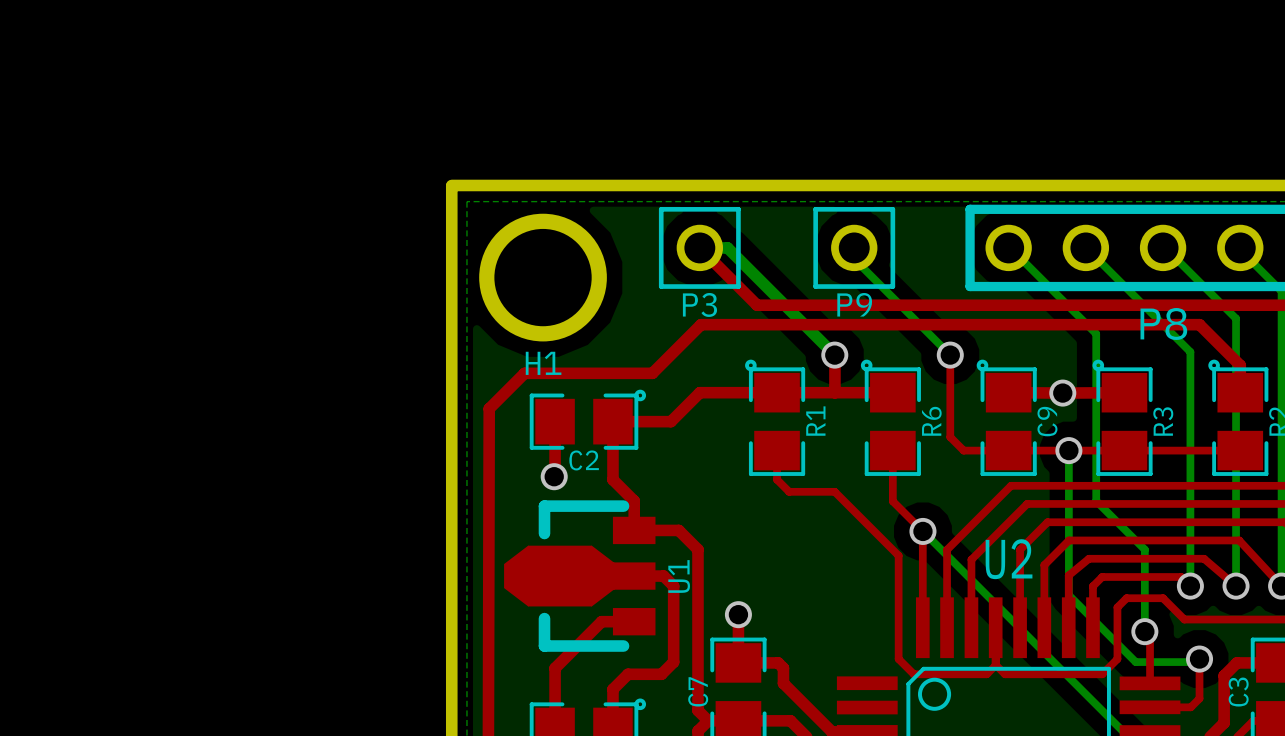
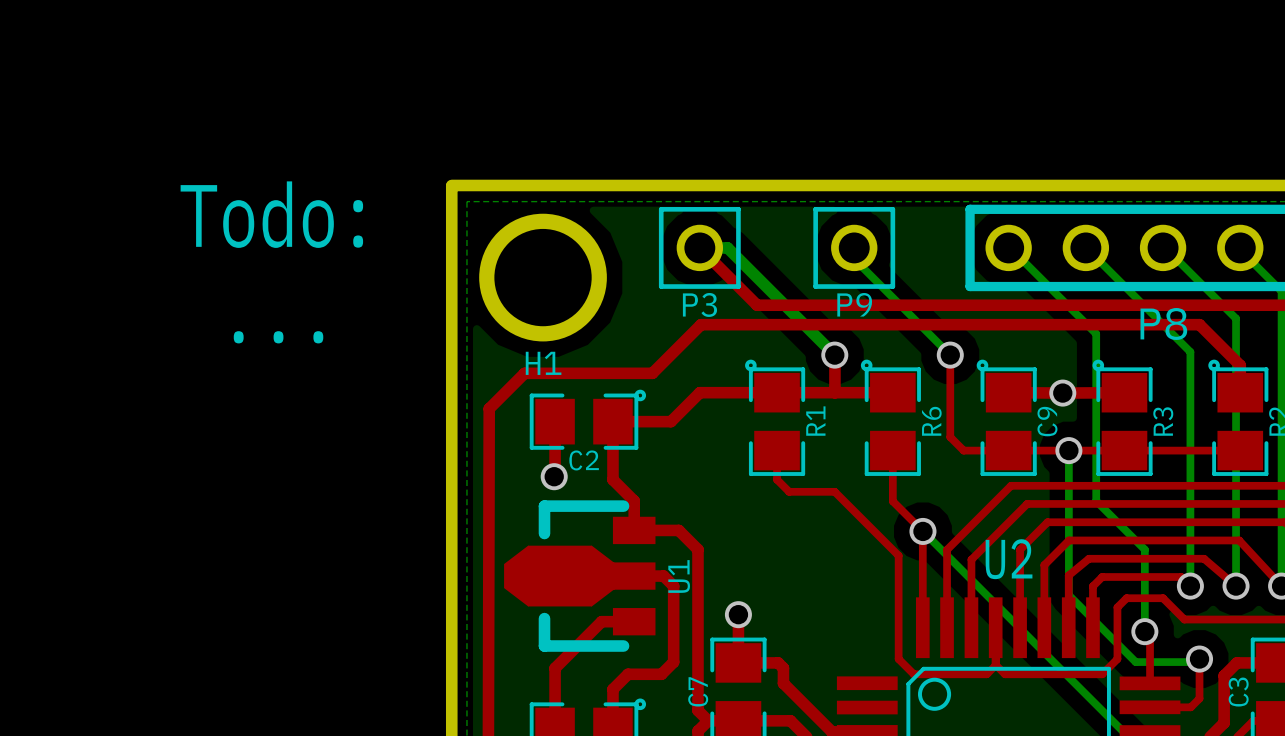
text: none -> Todo: (271, 214)
text: none -> ... (278, 337)

